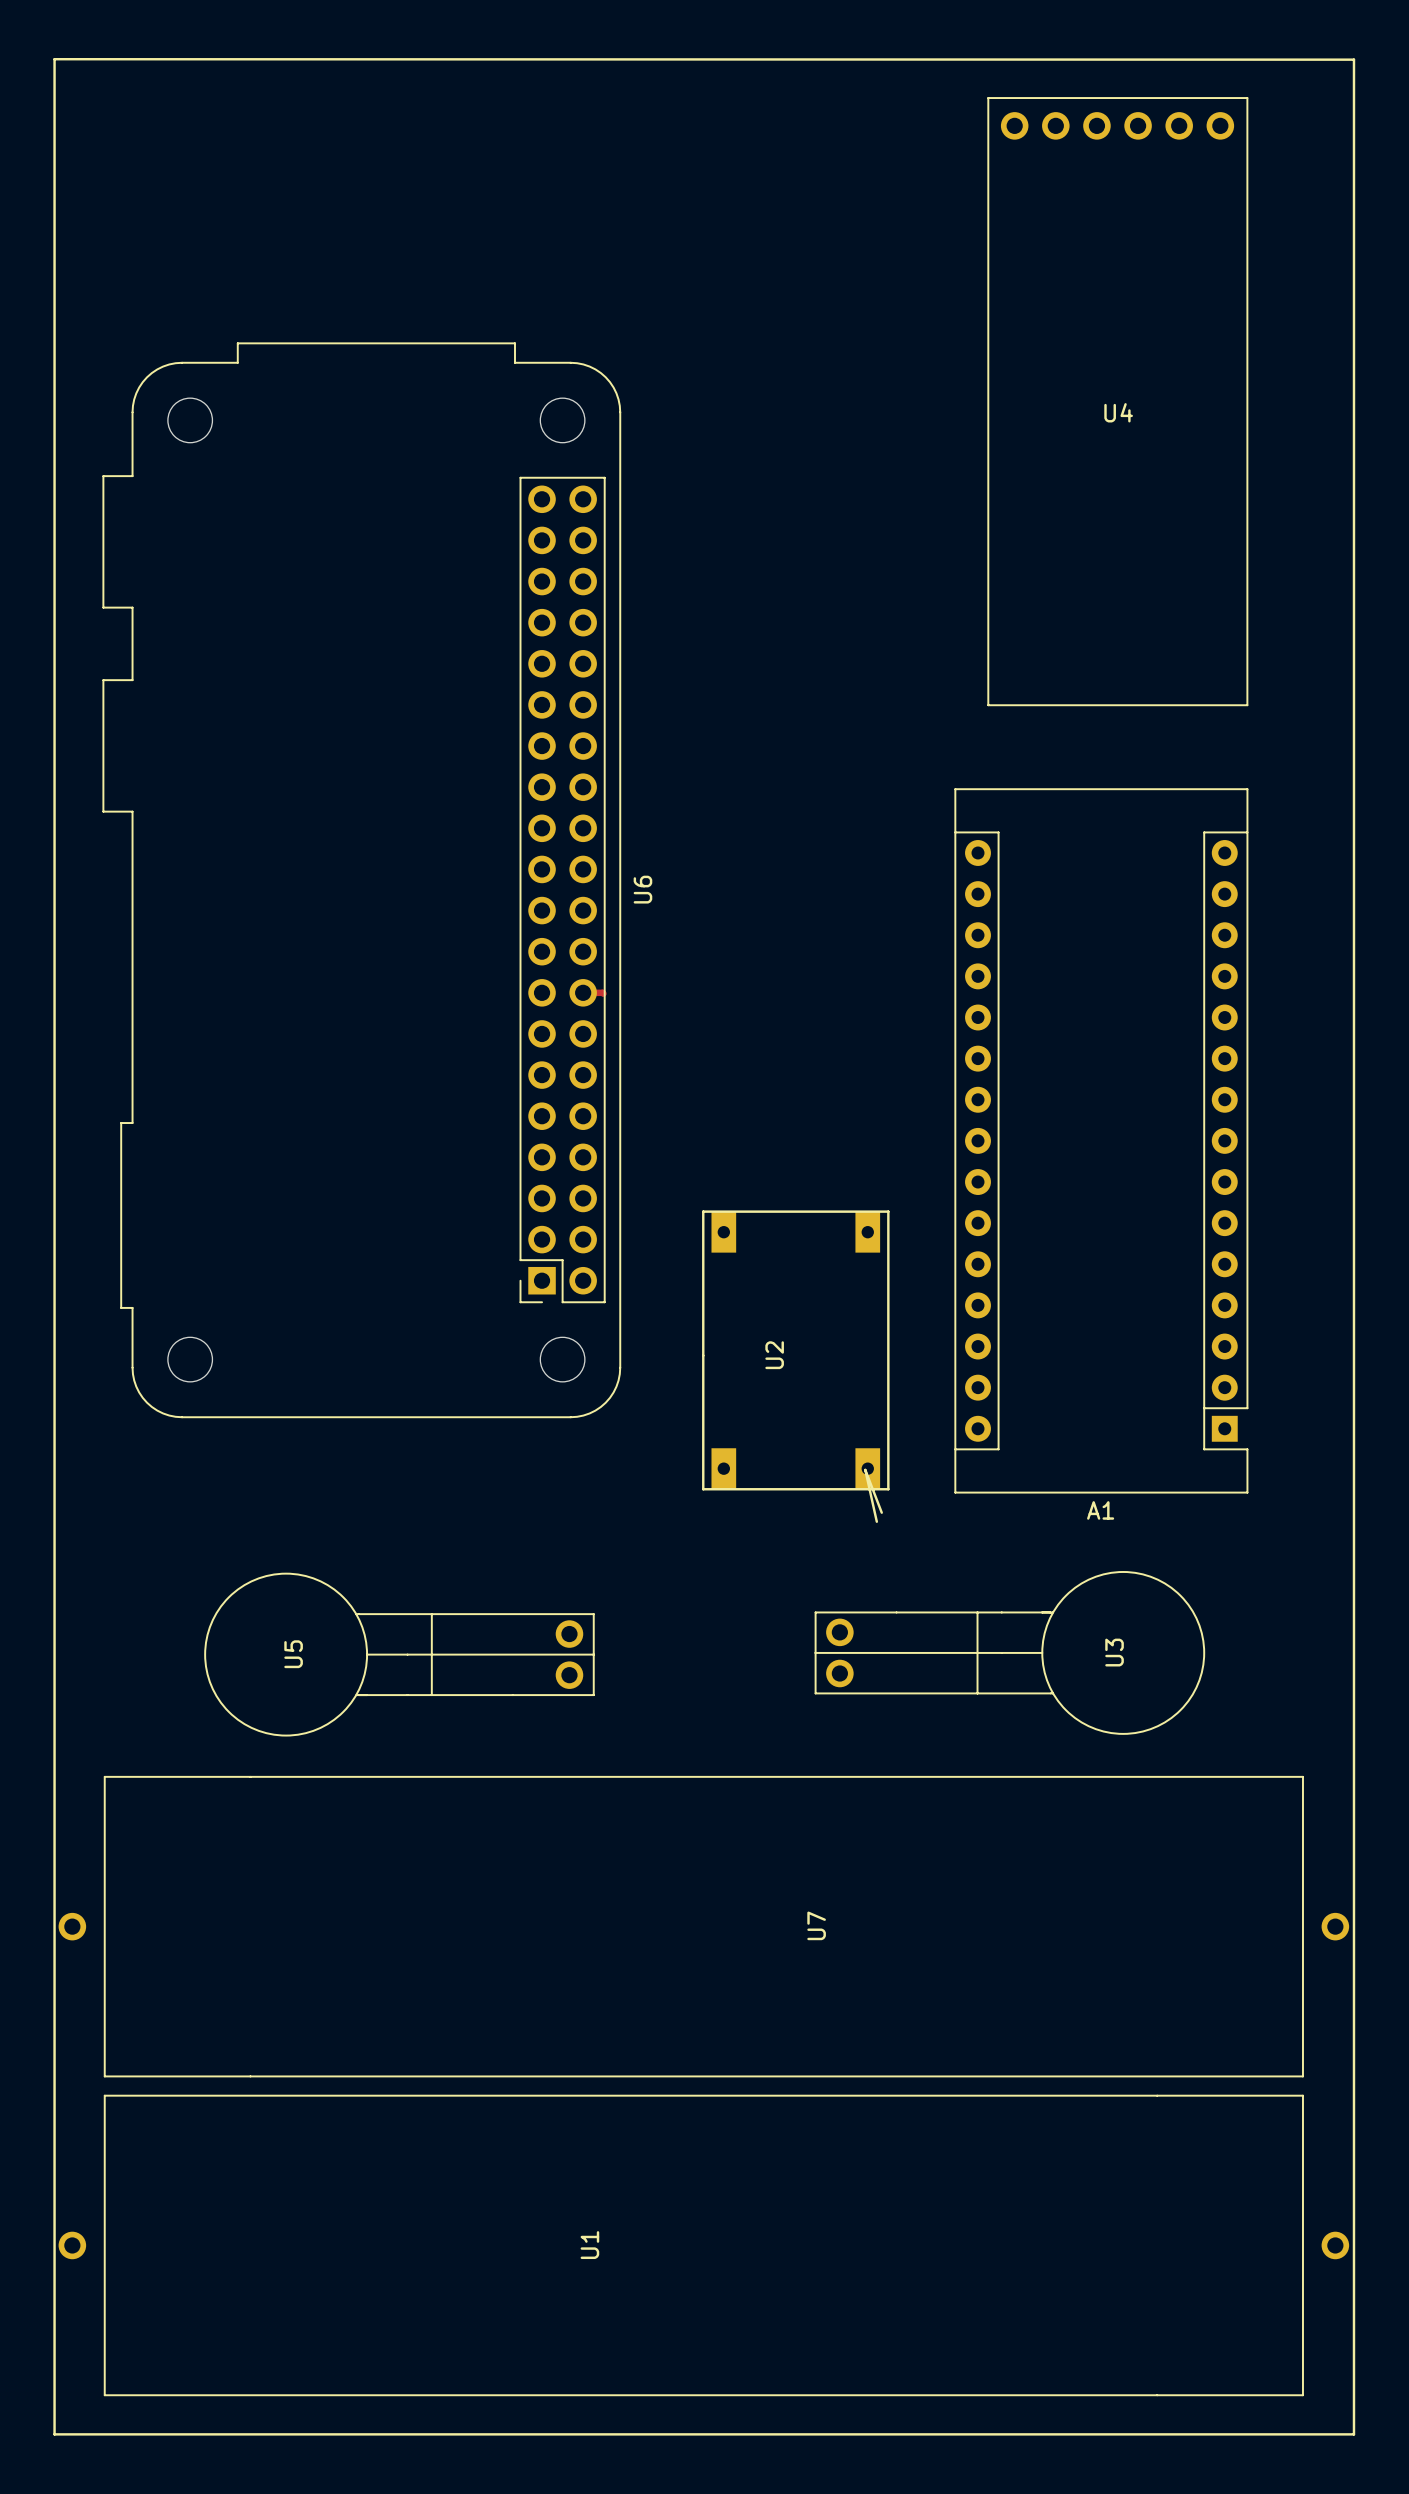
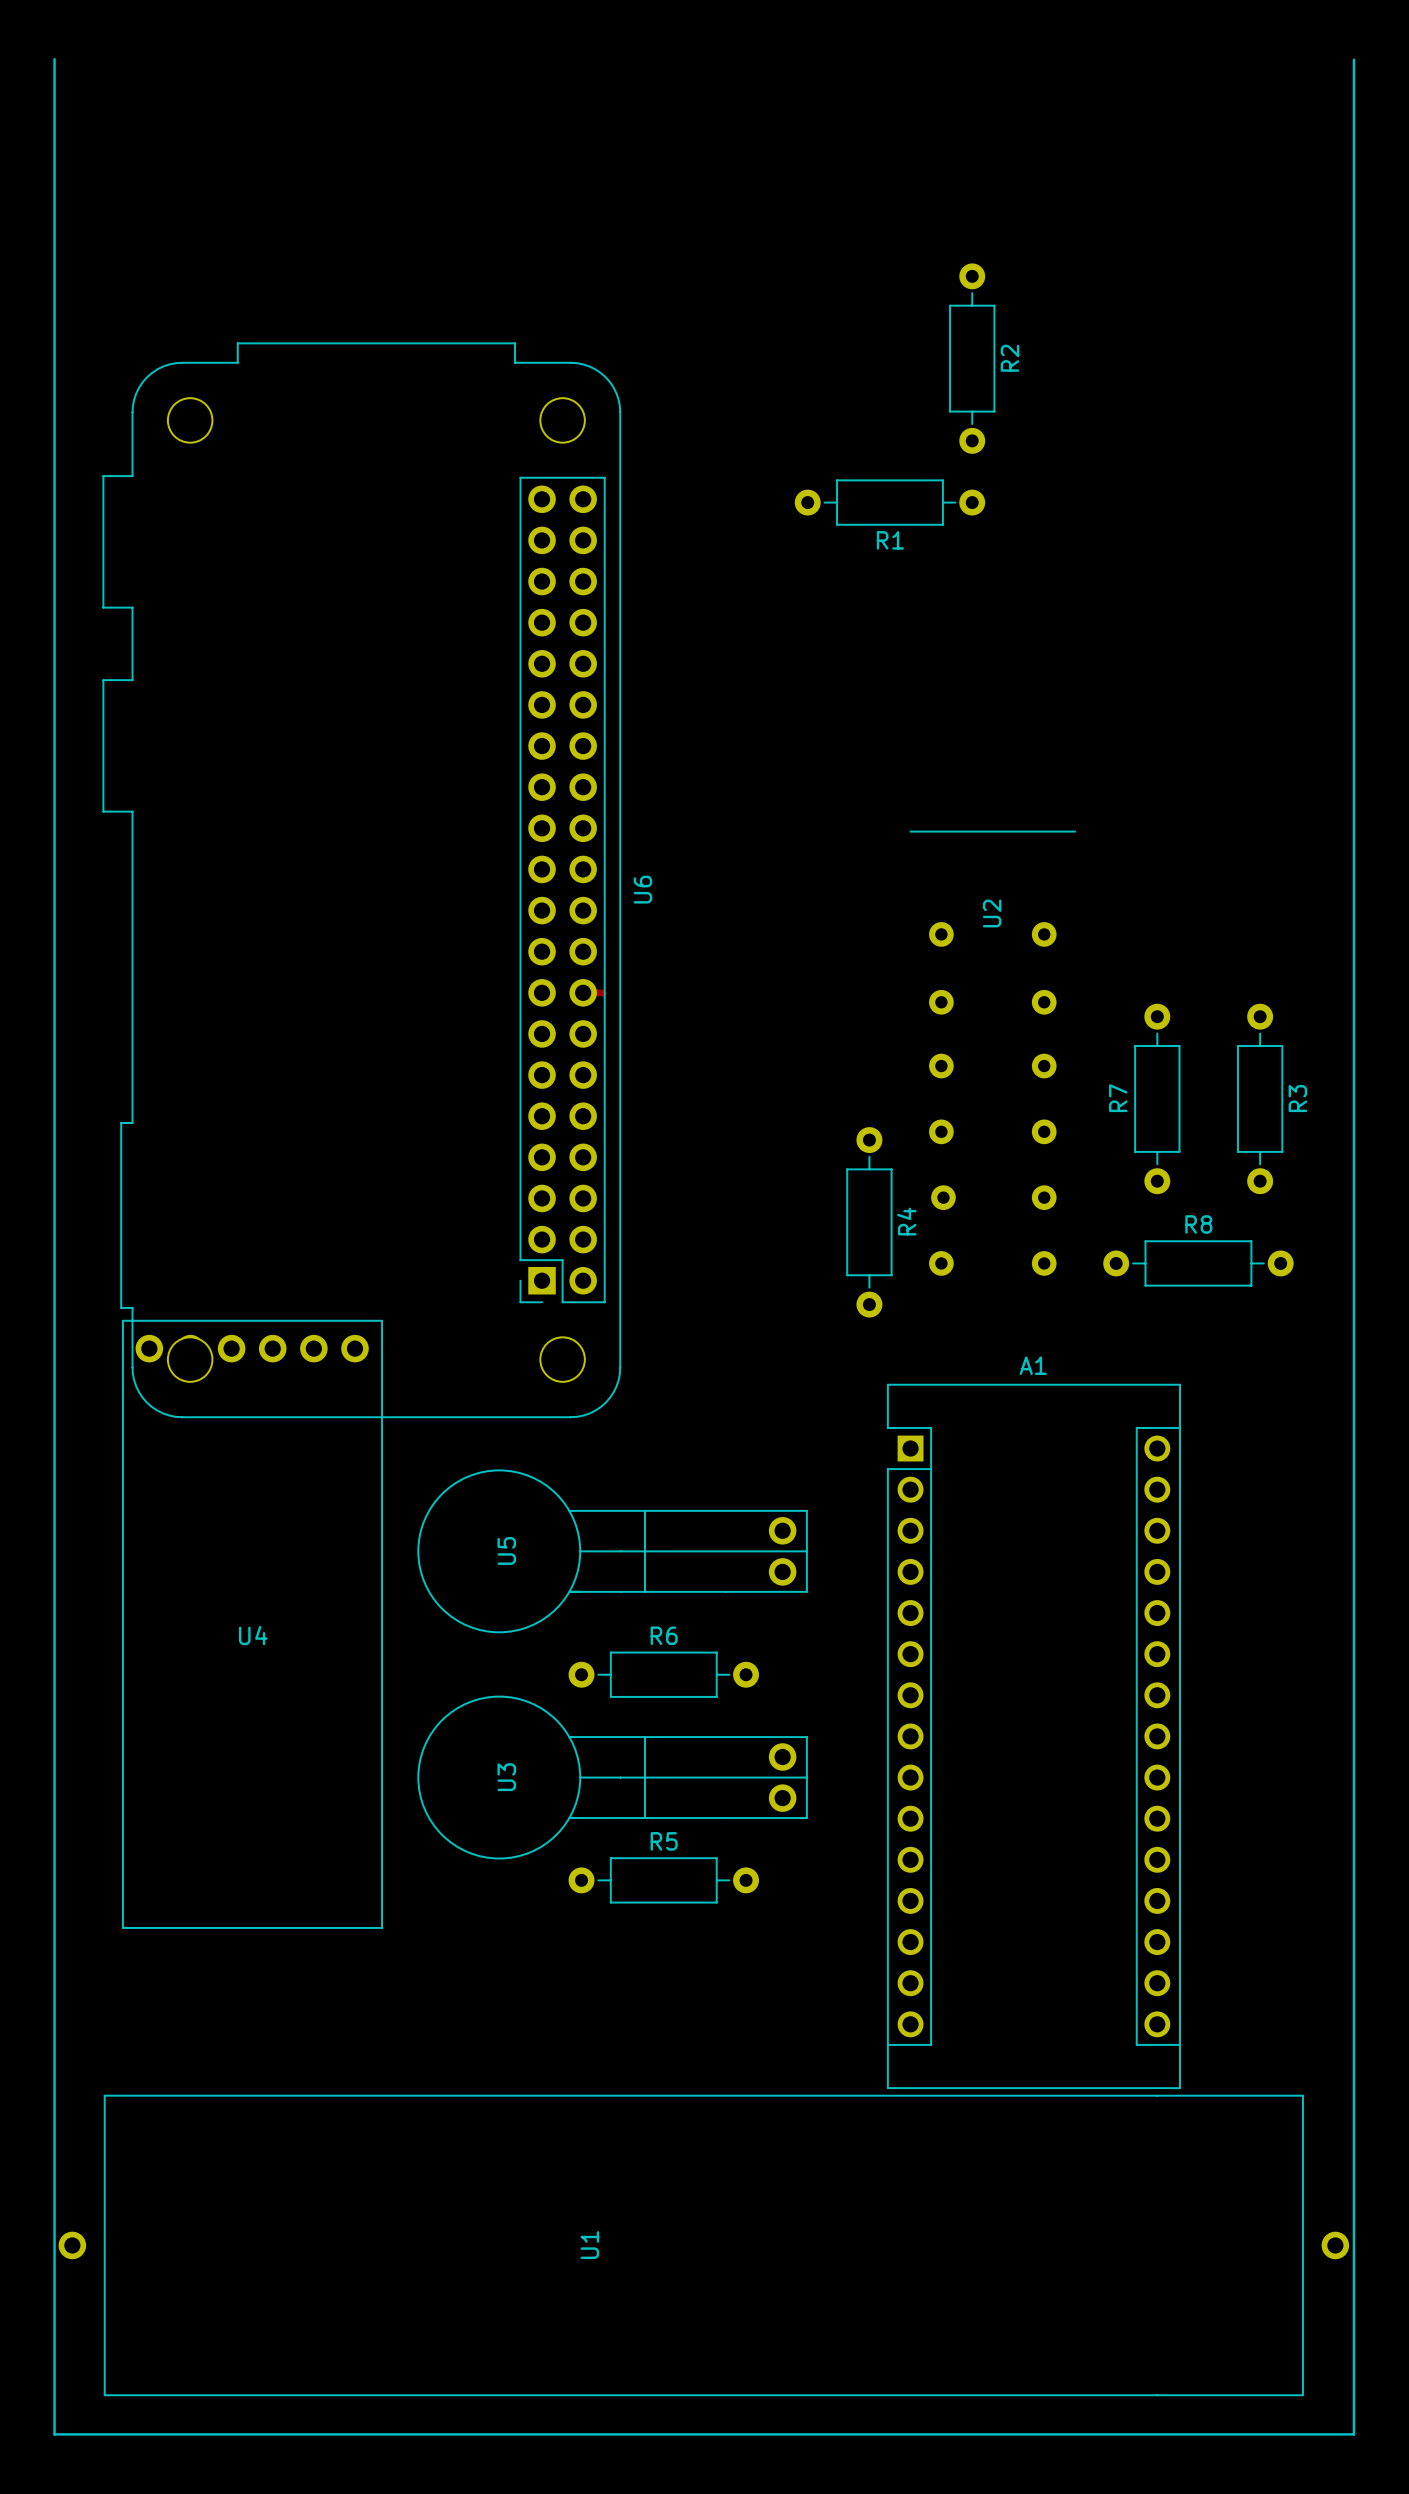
line: (54, 59) (1353, 59) -> none
R2: none -> (972, 358)
U4 position: (1117, 401) -> (252, 1624)
R1: none -> (889, 502)
A1 footprint: [954, 788, 1249, 1494] -> [886, 1383, 1181, 2090]
R7: none -> (1157, 1098)
R3: none -> (1260, 1098)
U2 footprint: [702, 1210, 890, 1491] -> [909, 830, 1077, 1276]
R4: none -> (869, 1222)
R8: none -> (1198, 1263)
U2 name position: U2 (774, 1355) -> U2 (992, 913)
A1 name position: A1 (1100, 1510) -> A1 (1033, 1365)
line: (881, 1512) (865, 1469) (876, 1521) -> none
U3 rotation: 0° (1009, 1652) -> 180° (612, 1777)
U3 position: (1009, 1652) -> (612, 1777)
U5 position: (399, 1654) -> (612, 1551)
R6: none -> (663, 1674)
R5: none -> (663, 1880)
U7: (703, 1926) -> none

